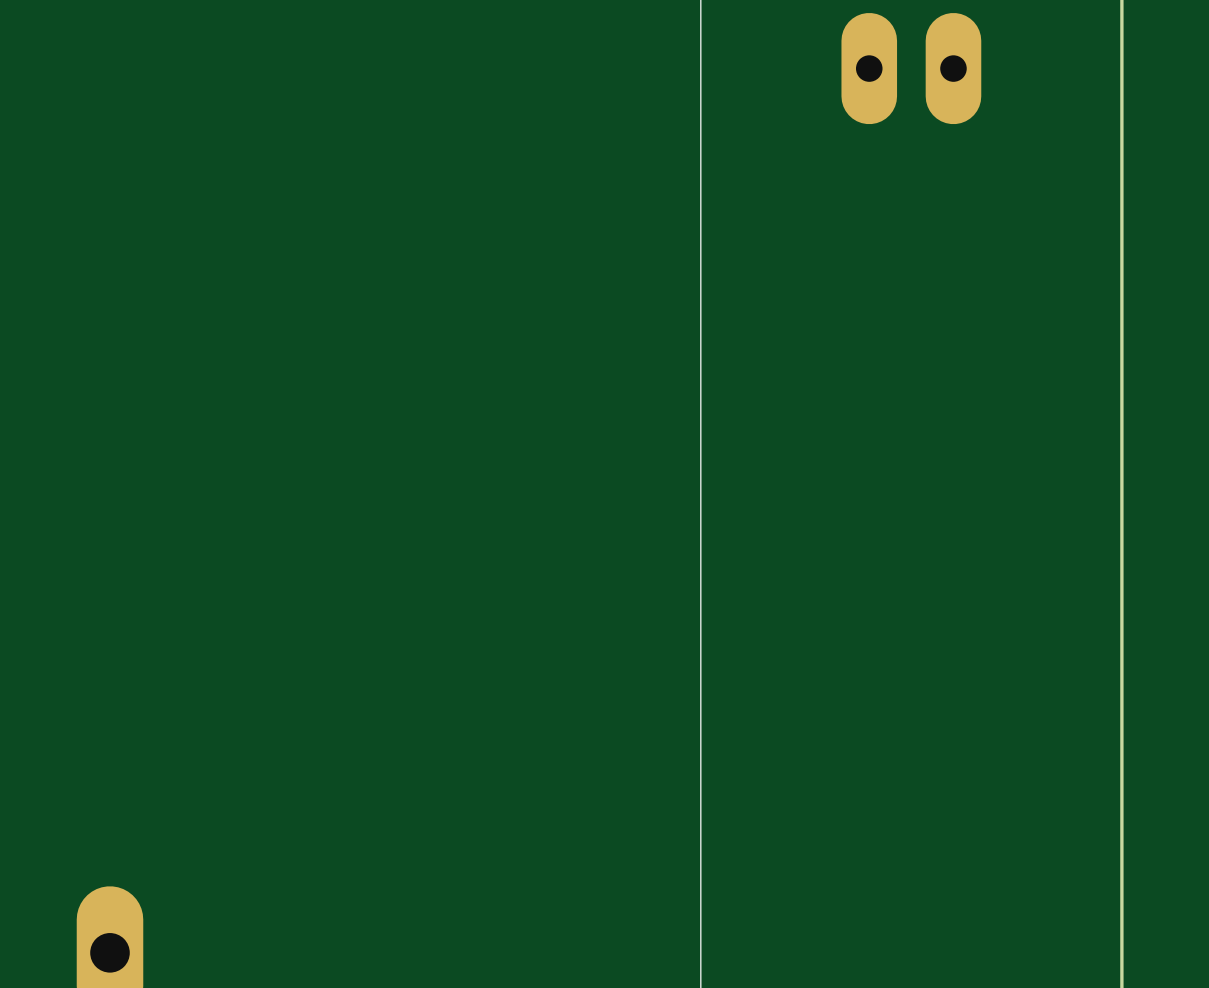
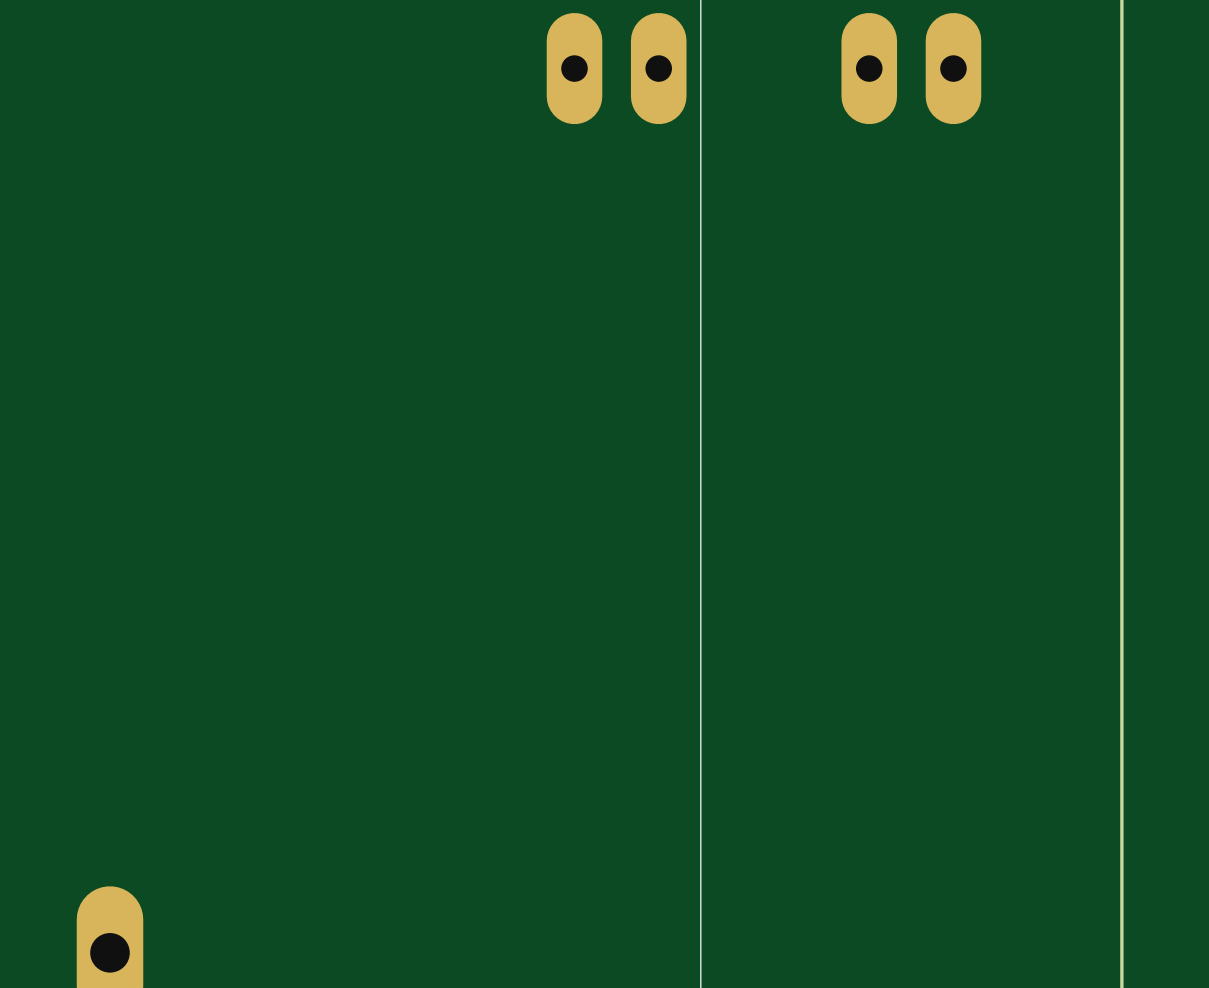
part: none -> (616, 68)

